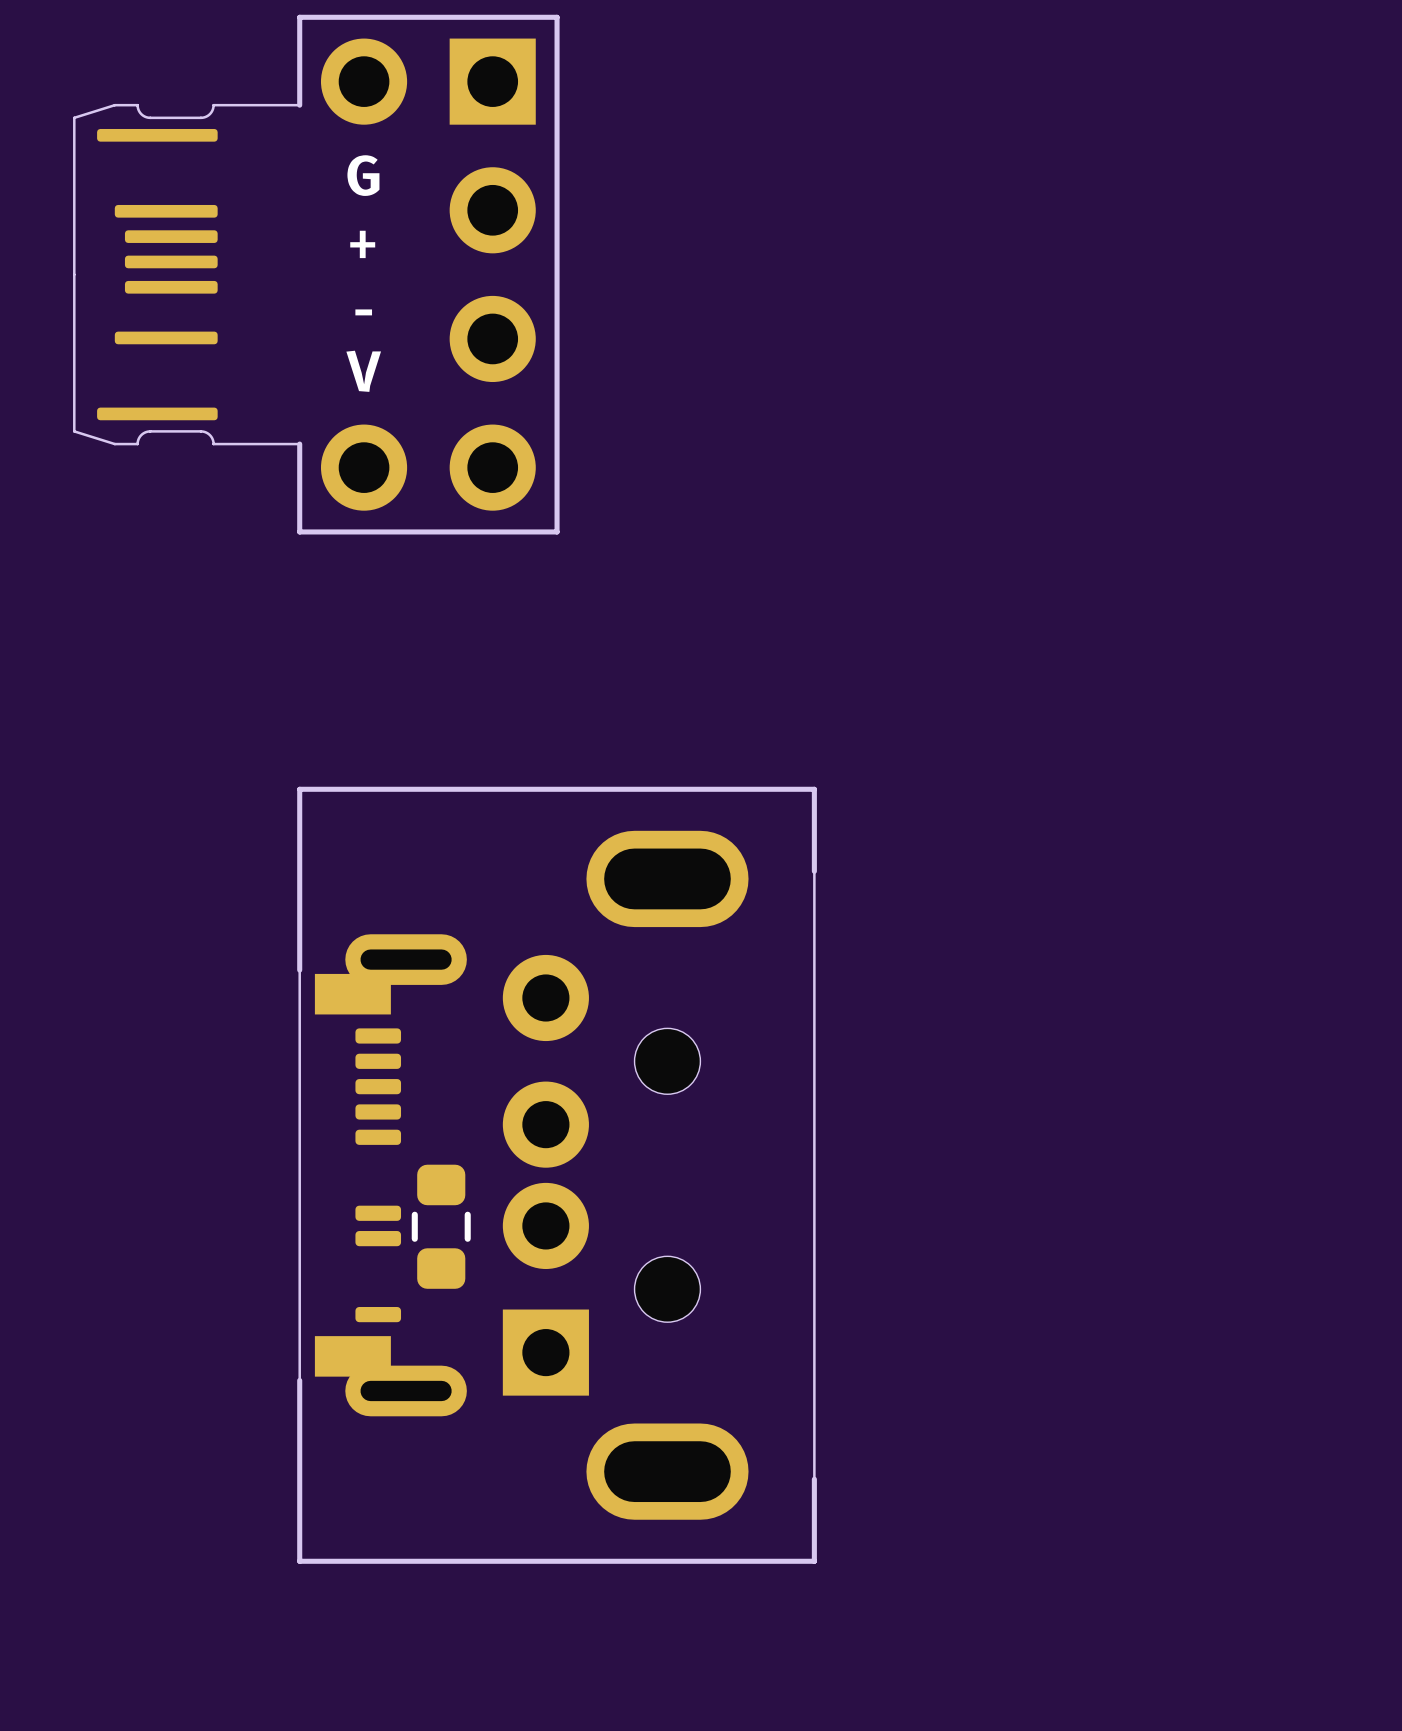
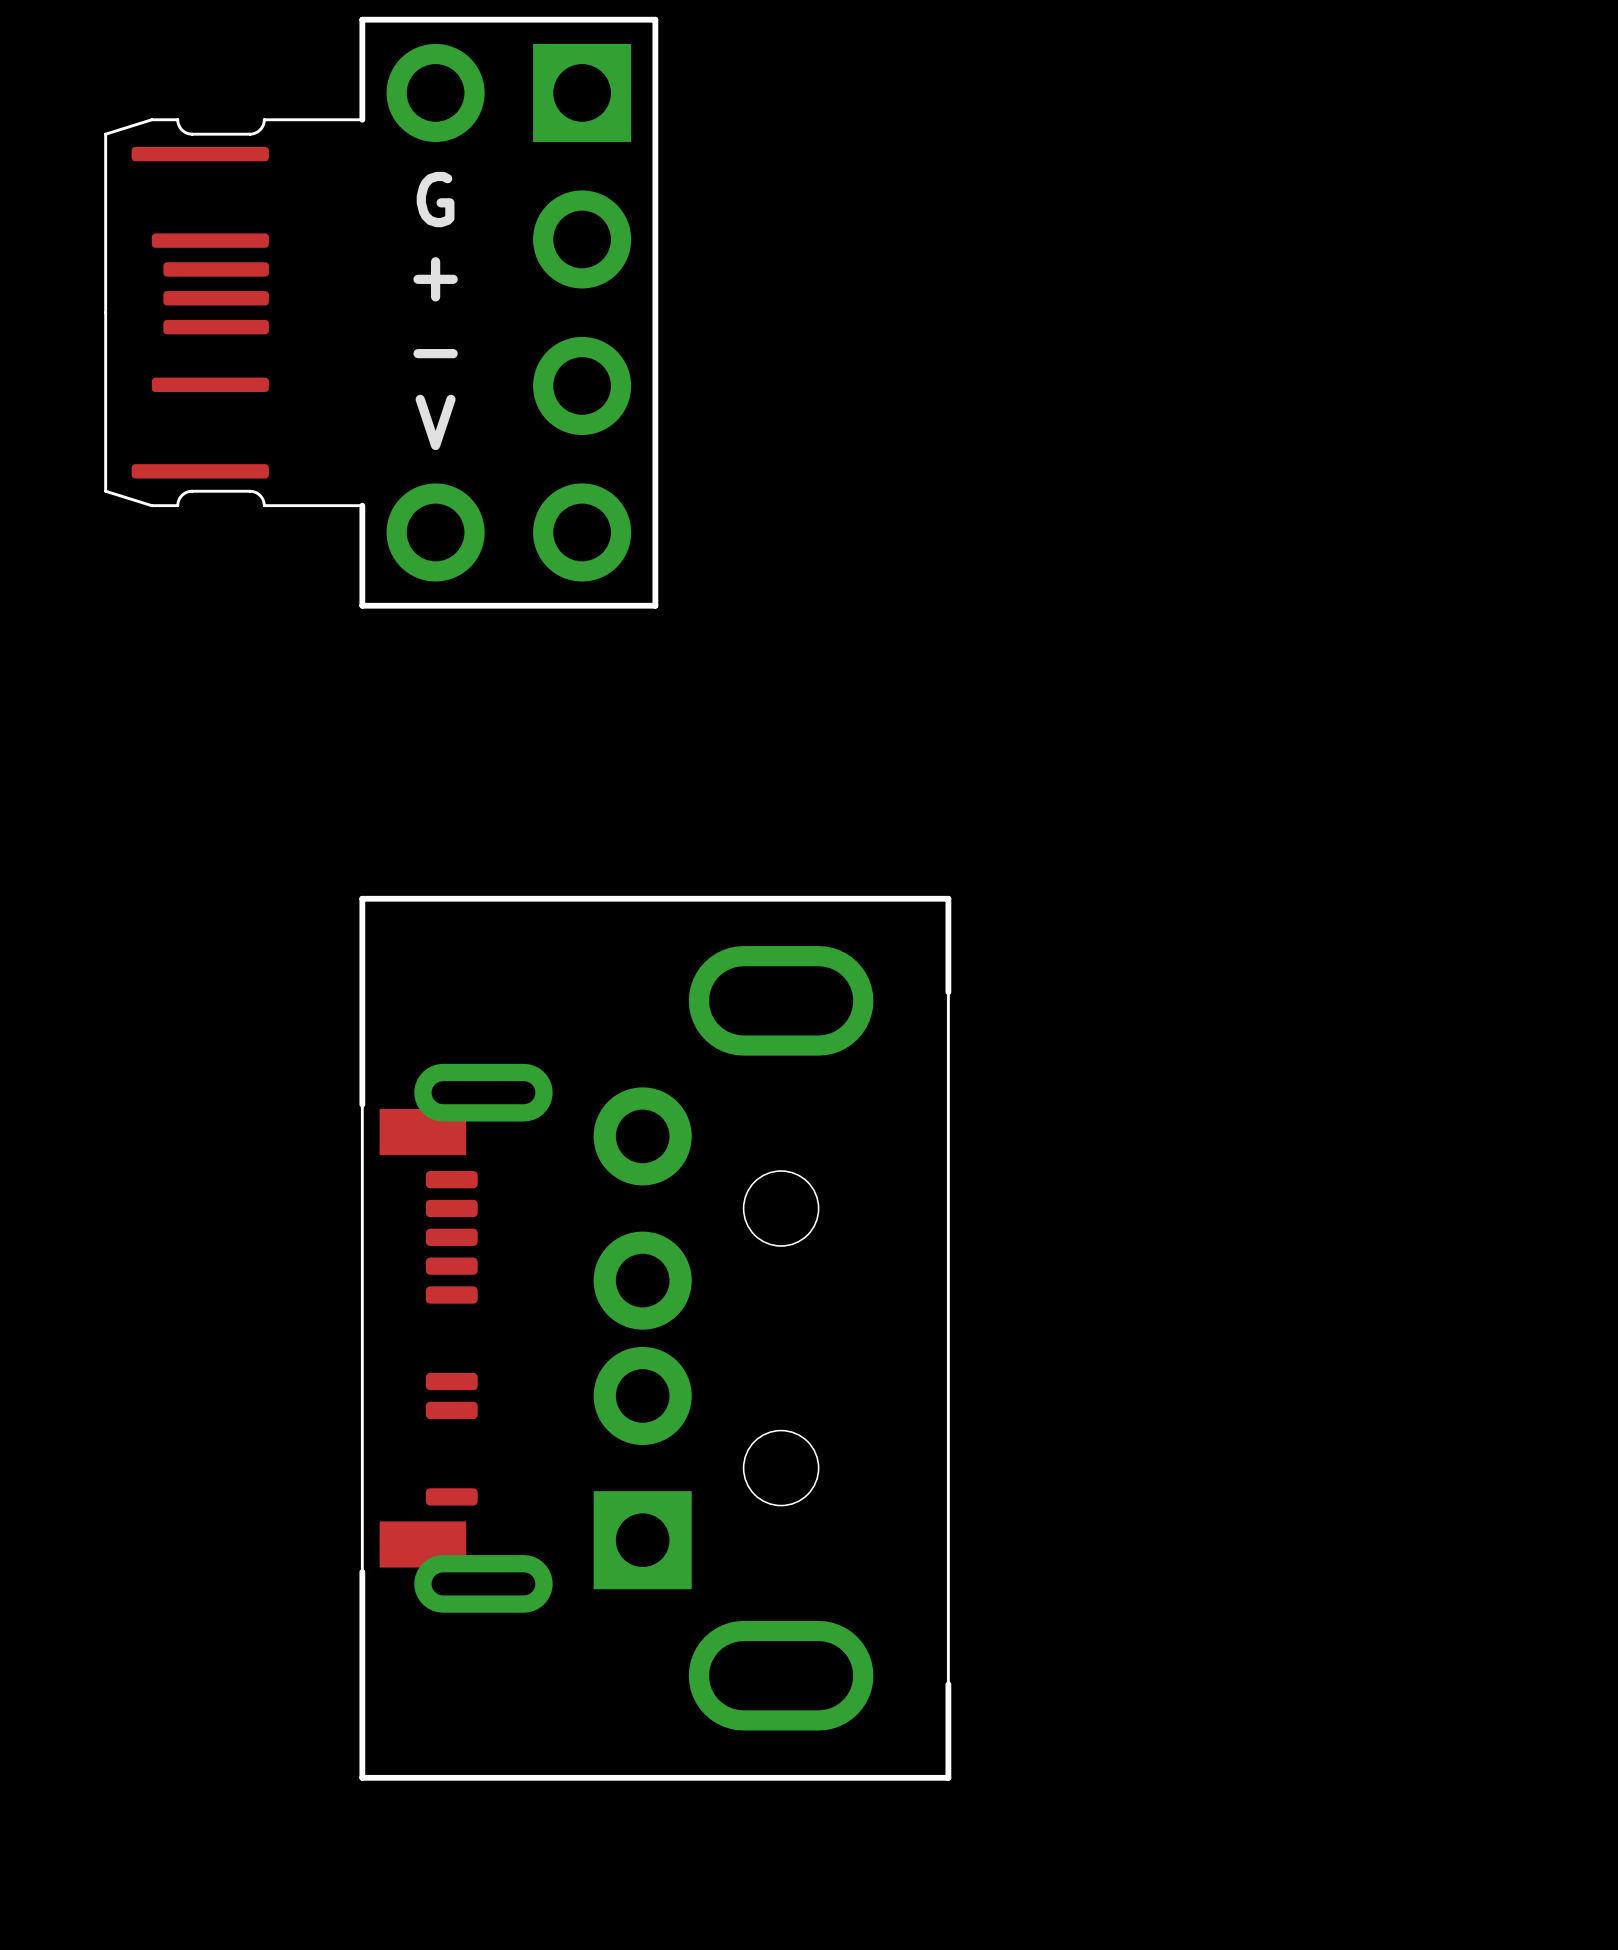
part: (441, 1226) -> none

